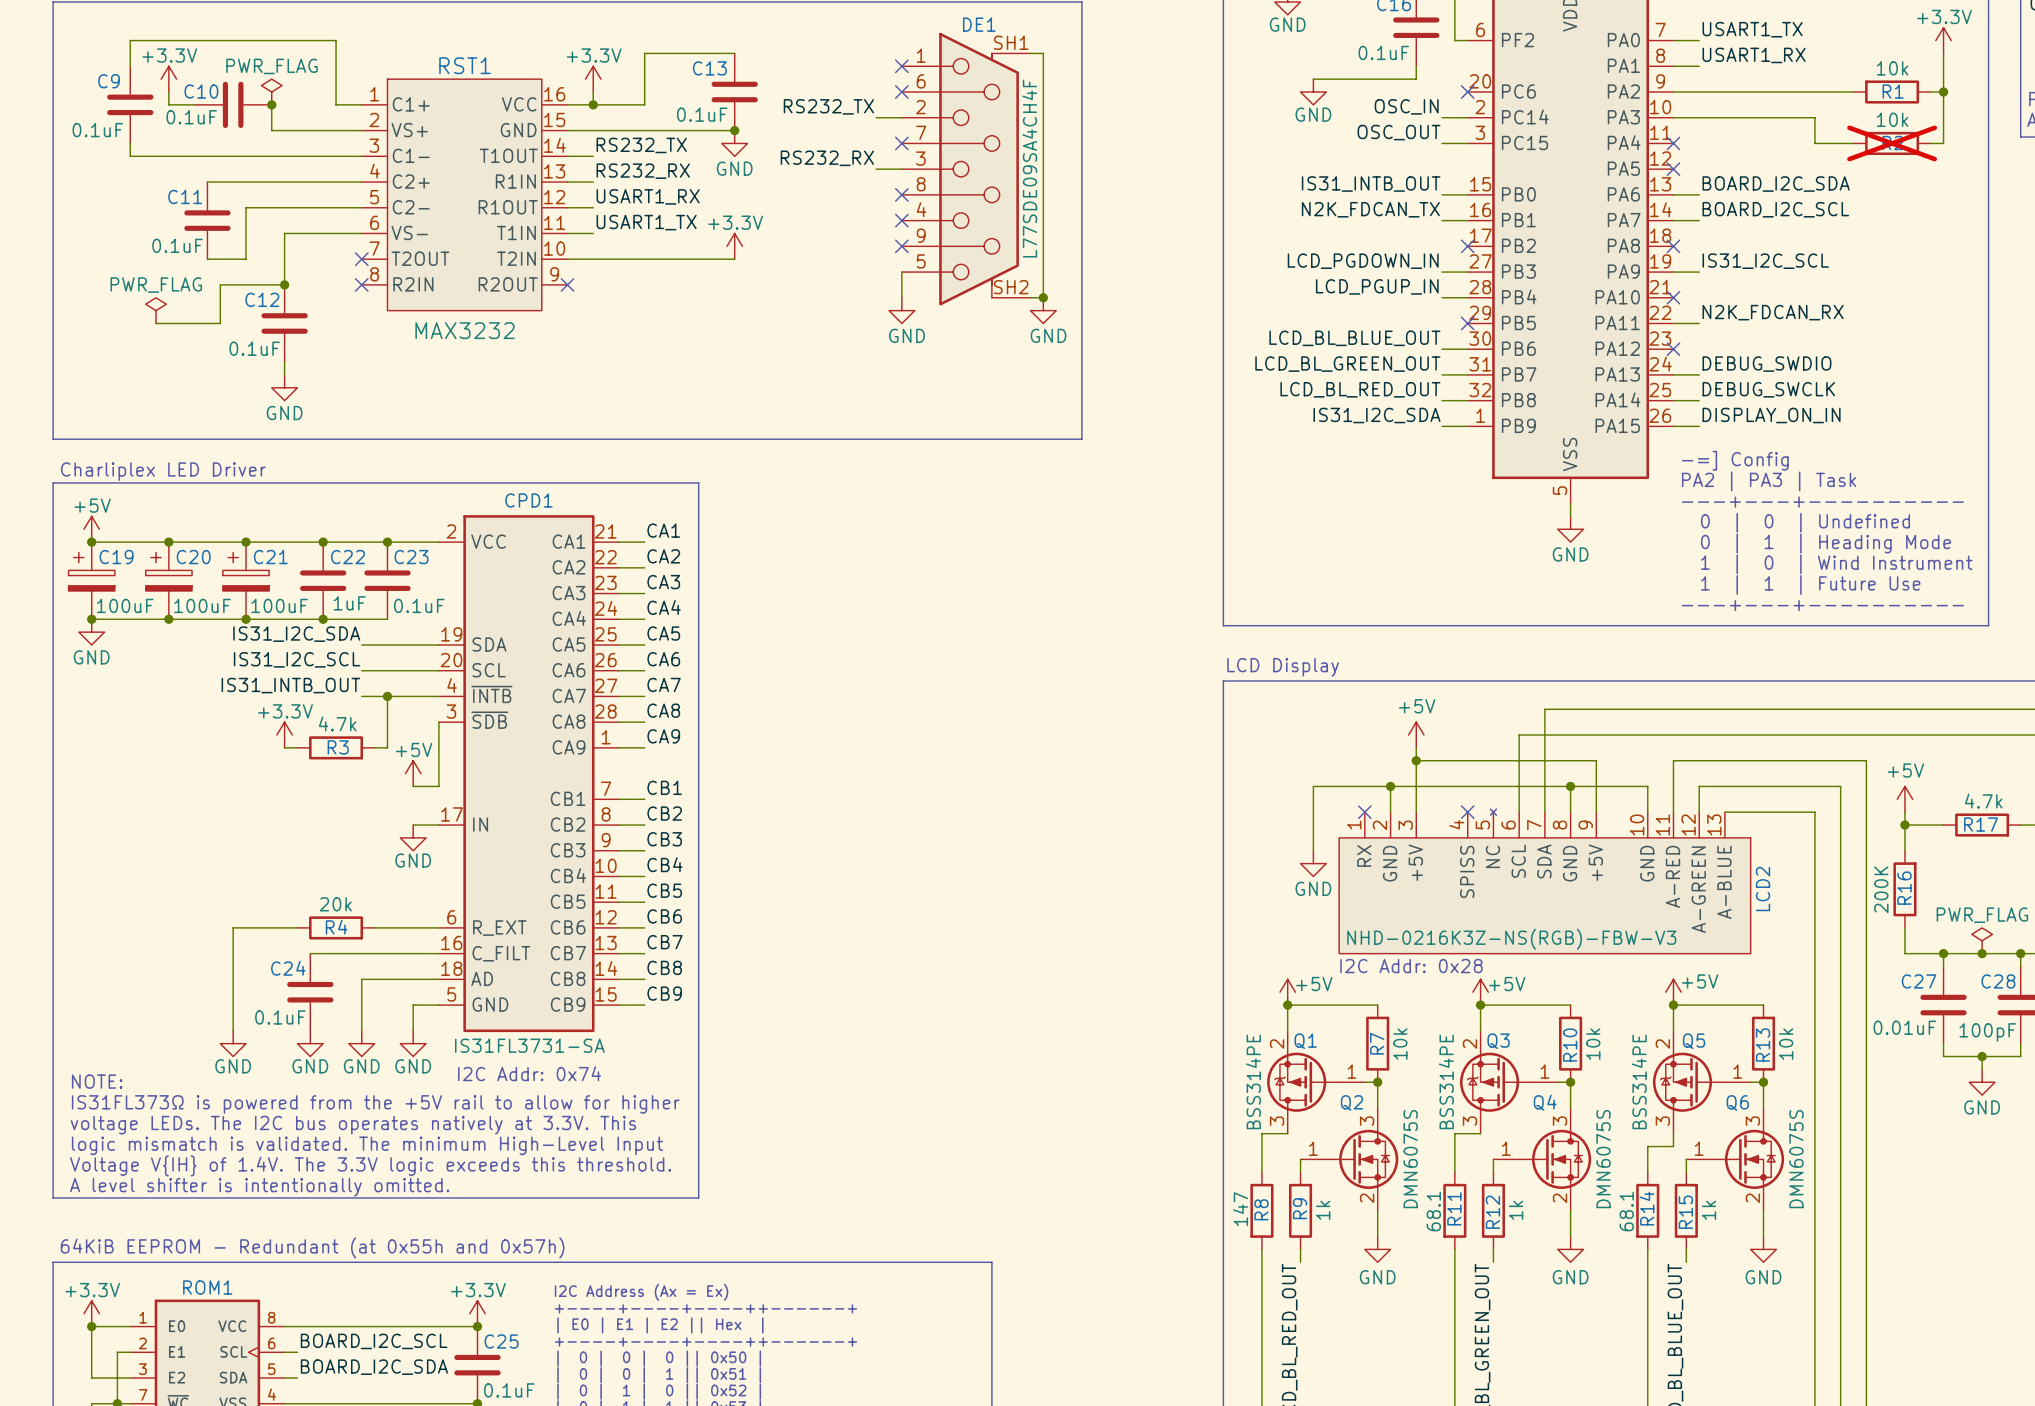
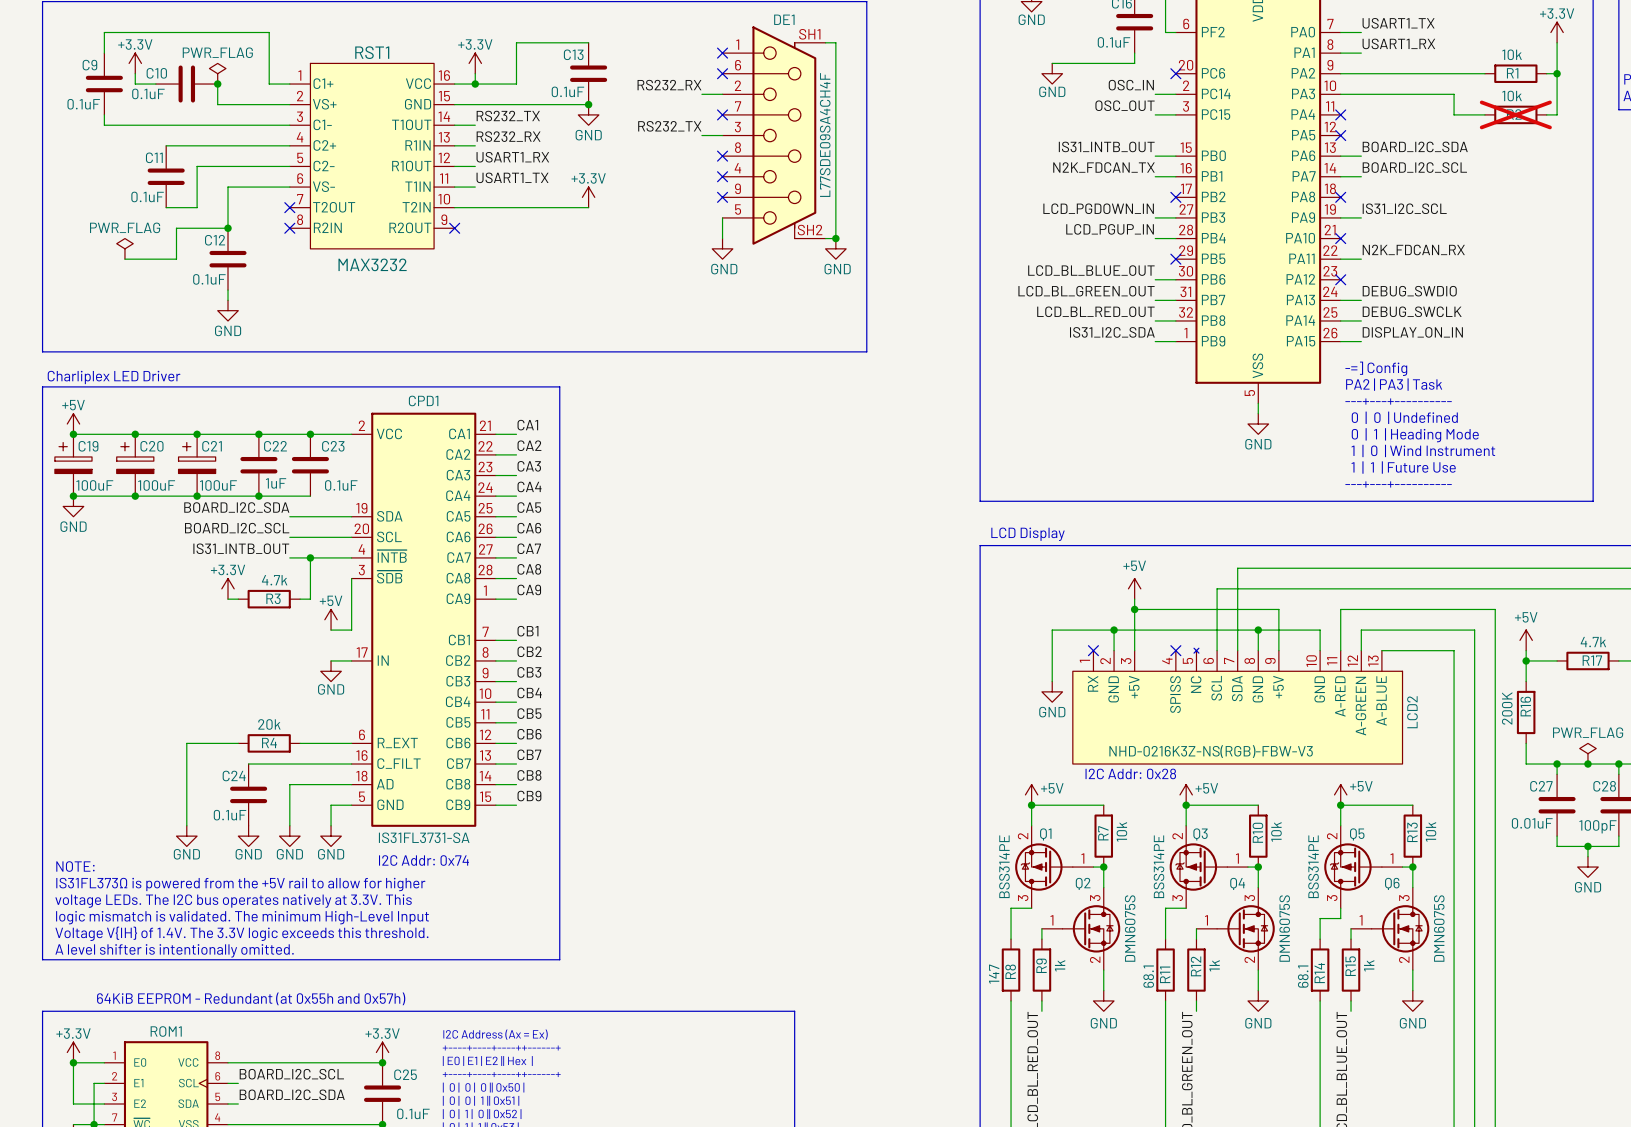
label: RS232_TX (828, 106) -> RS232_RX (669, 85)
label: RS232_RX (827, 158) -> RS232_TX (669, 126)
label: IS31_I2C_SDA (296, 634) -> BOARD_I2C_SDA (236, 507)
label: IS31_I2C_SCL (297, 659) -> BOARD_I2C_SCL (237, 528)

